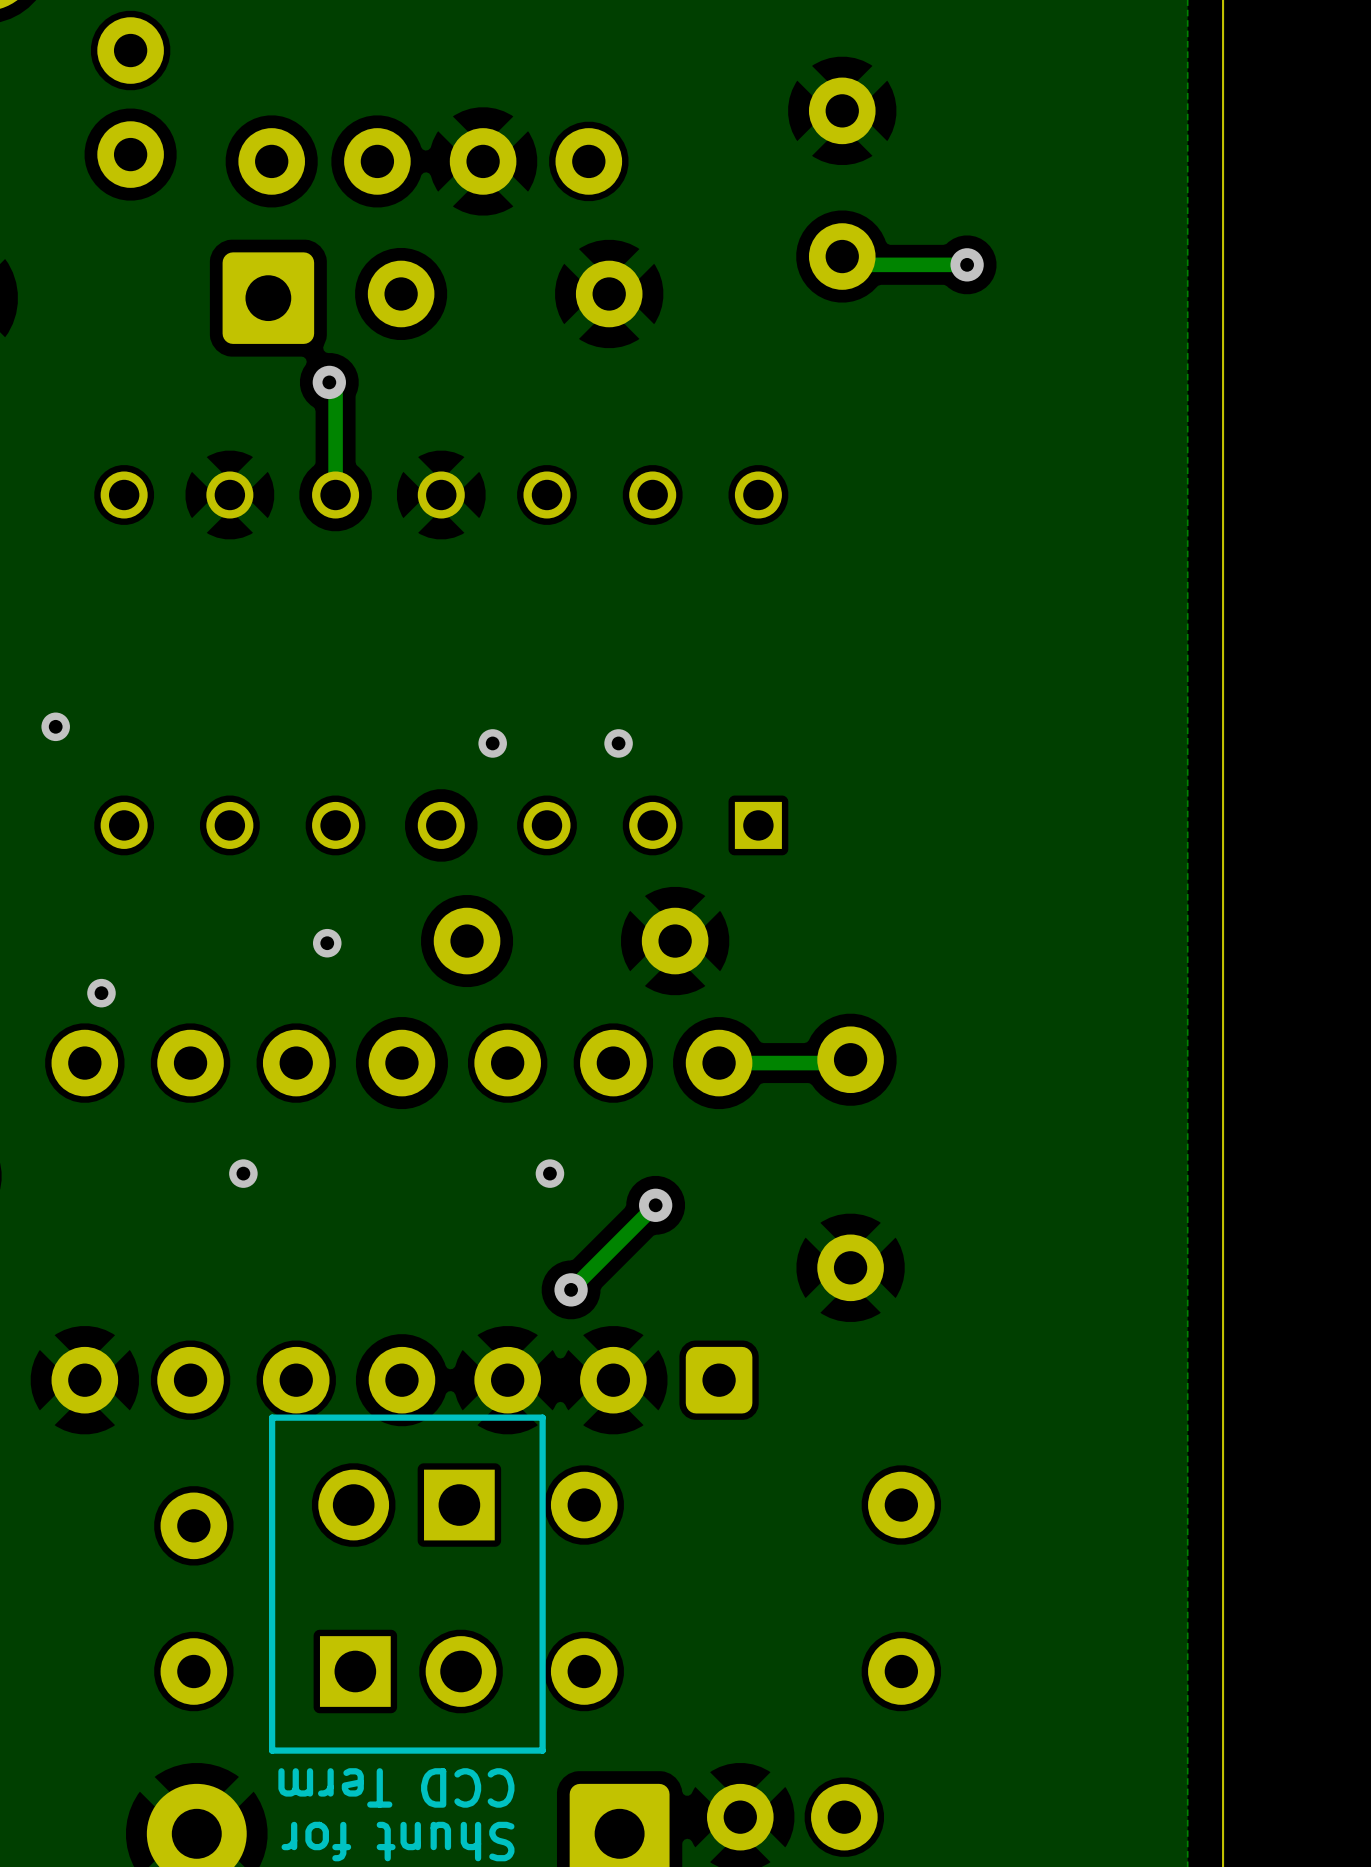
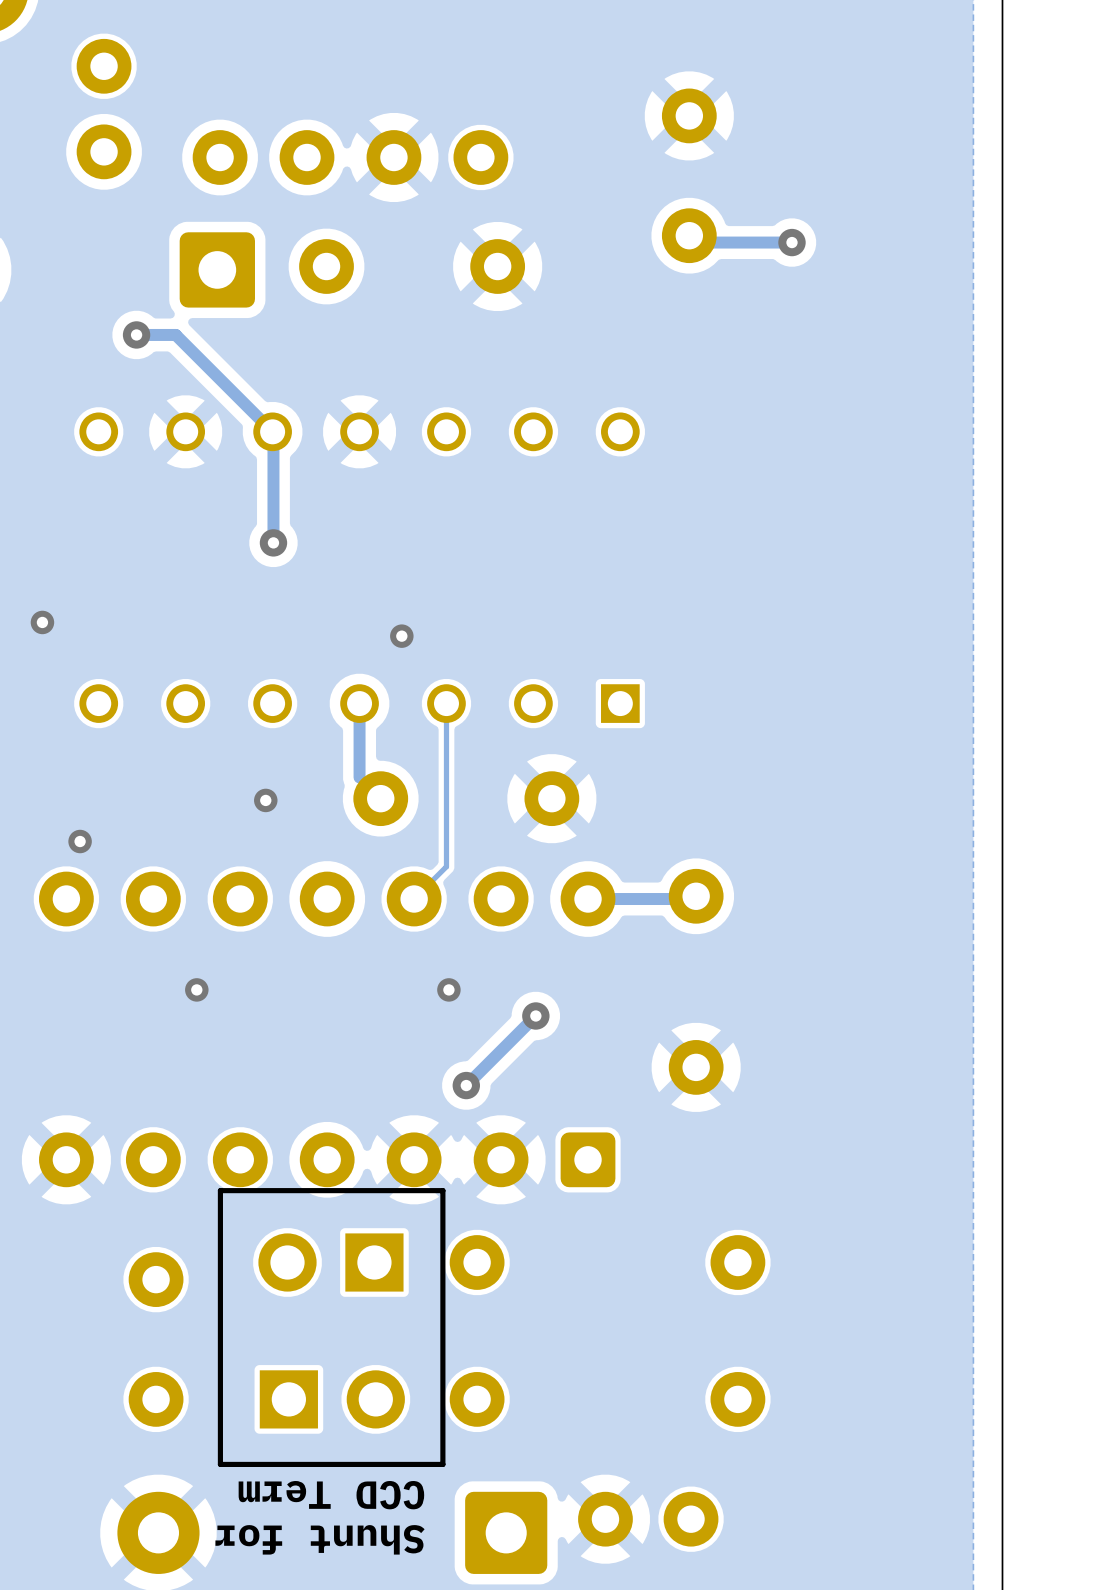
via: none -> (136, 334)
track: (329, 382) (335, 388) (335, 494) -> (136, 334) (175, 334) (272, 431)
via: (329, 382) -> none
track: none -> (273, 432) (273, 542)
via: none -> (273, 542)
via: (618, 743) -> none
track: none -> (359, 703) (359, 777)
track: none -> (446, 703) (446, 866) (414, 899)

